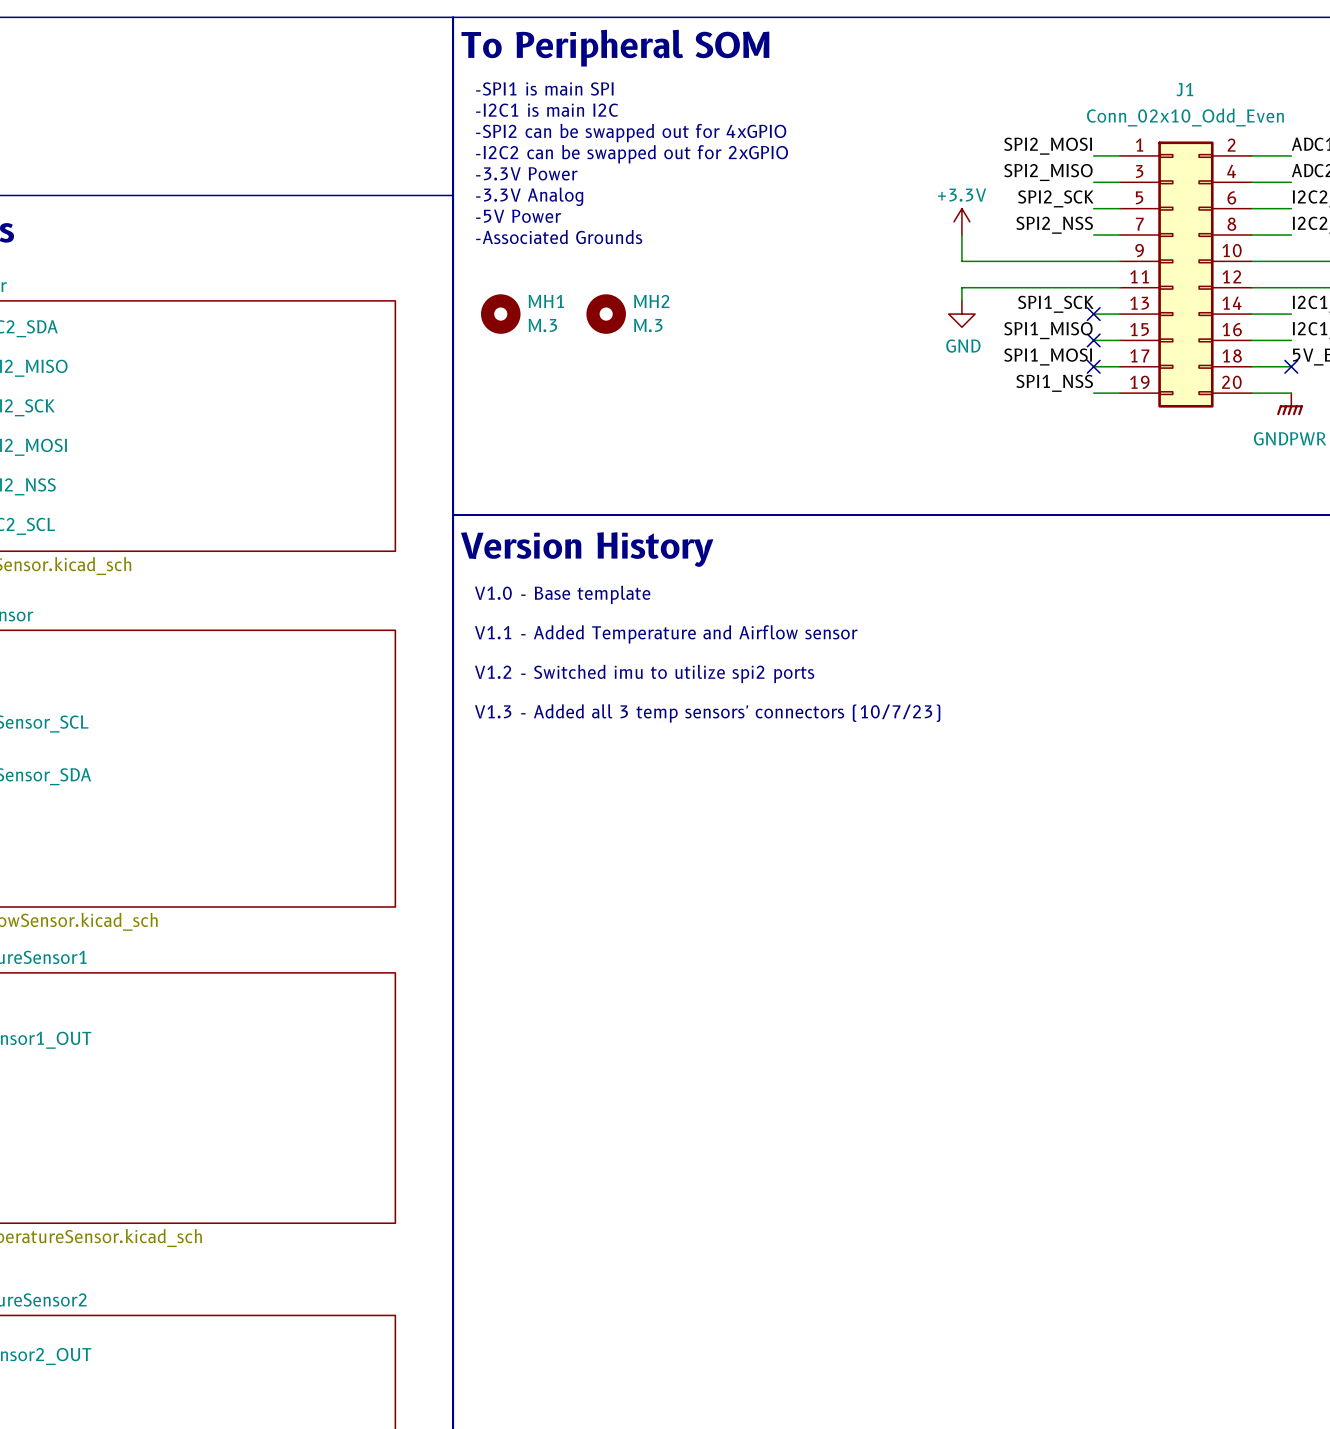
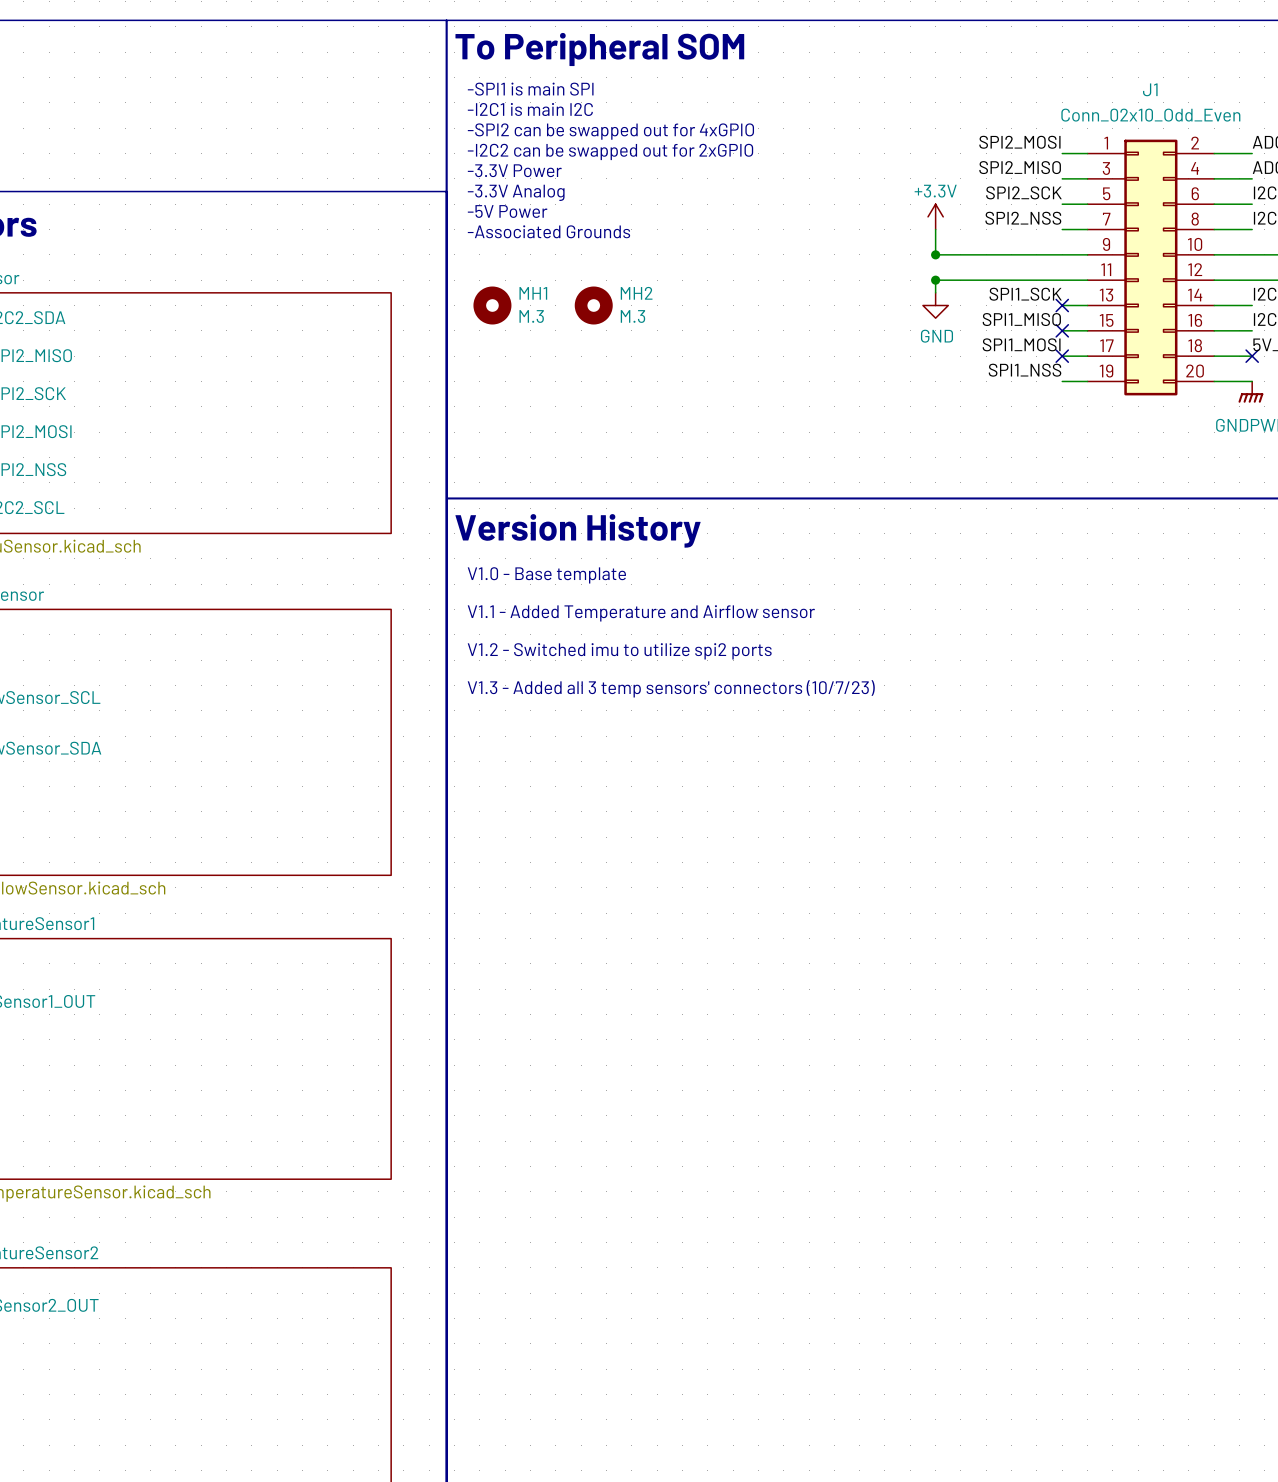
junction: none -> (935, 254)
junction: none -> (935, 280)

